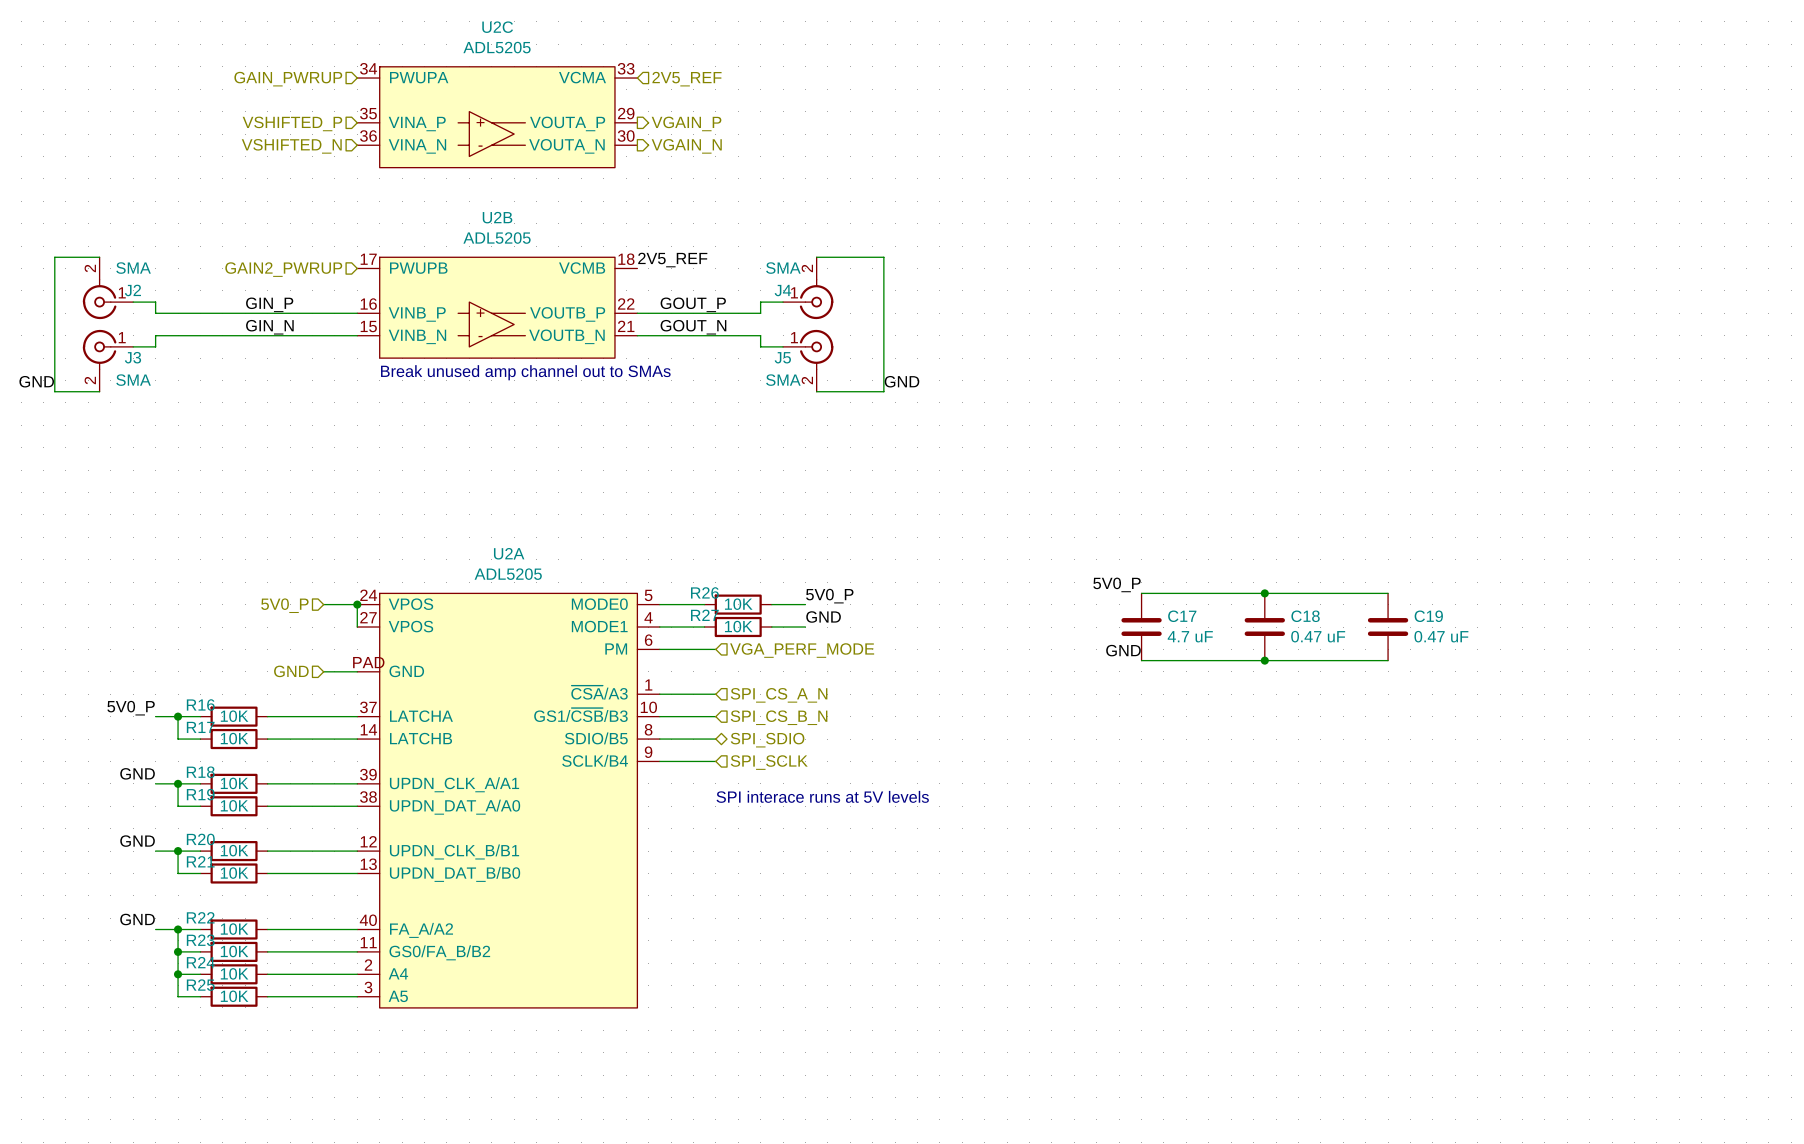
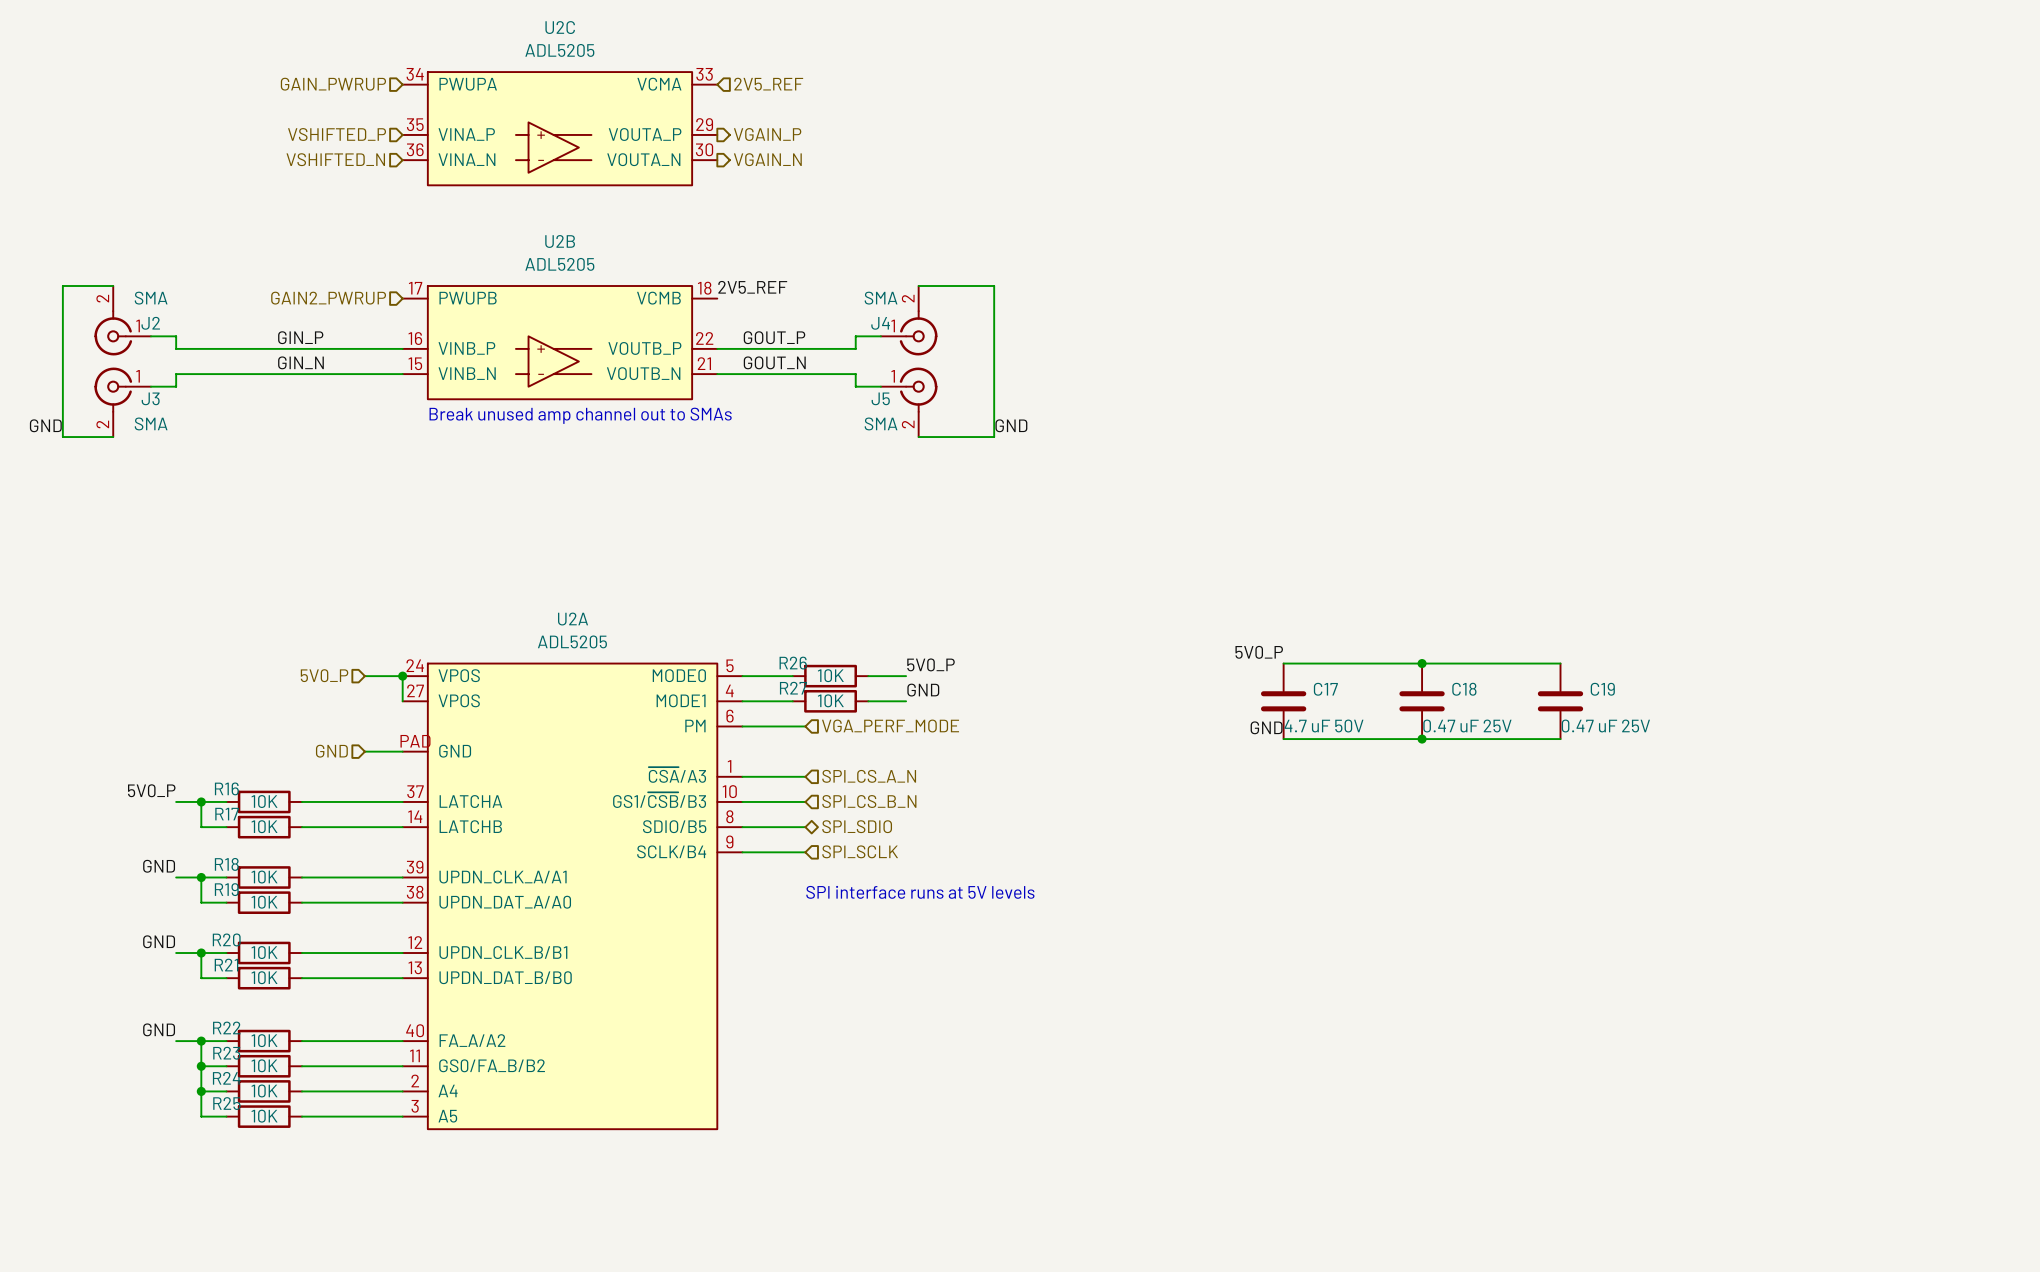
C17 value: 4.7 uF (1190, 636) -> 4.7 uF 50V (1323, 726)
C18 value: 0.47 uF (1318, 636) -> 0.47 uF 25V (1467, 726)
C19 value: 0.47 uF (1441, 636) -> 0.47 uF 25V (1605, 726)
text: SPI interace runs at 5V levels (822, 796) -> SPI interface runs at 5V levels (920, 892)

